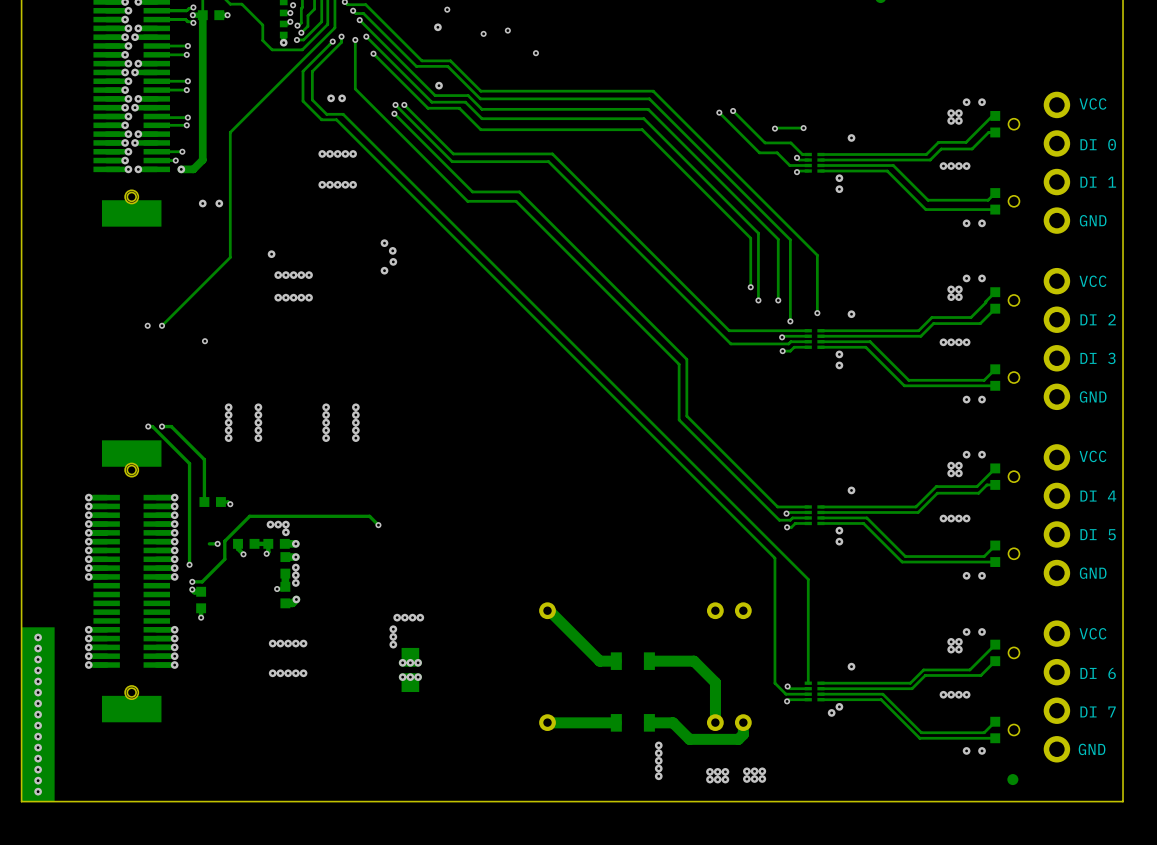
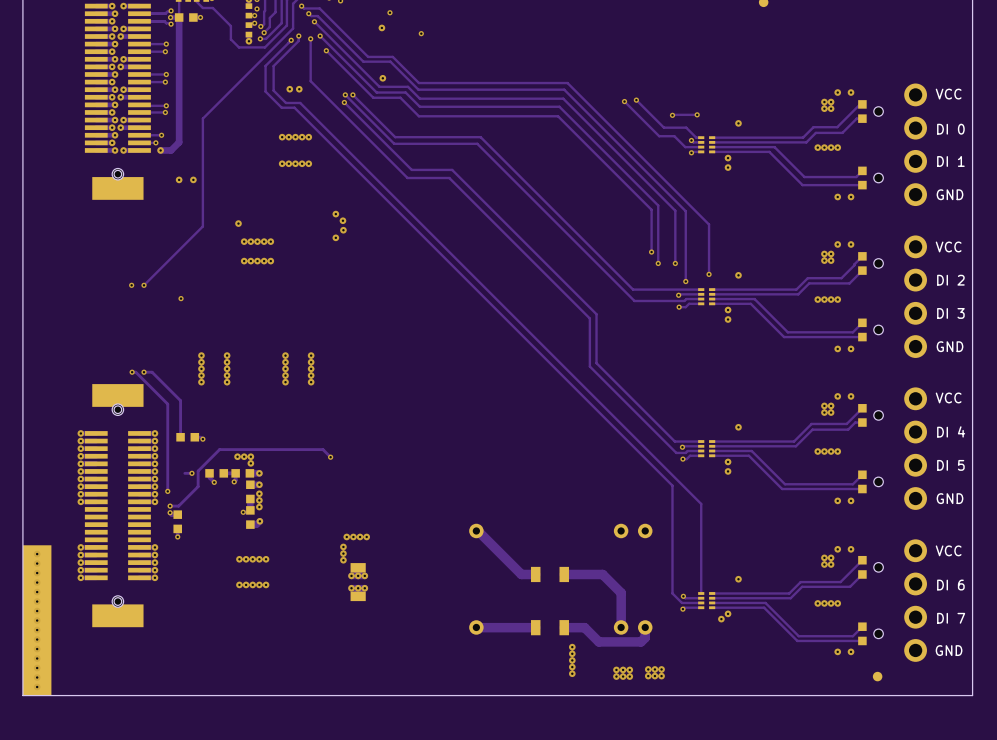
via: (507, 30) -> none
via: (535, 53) -> none

